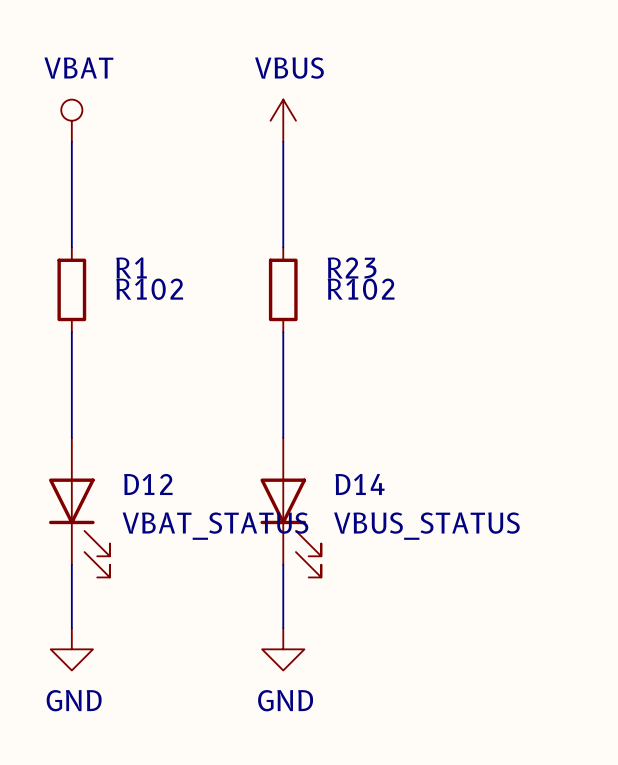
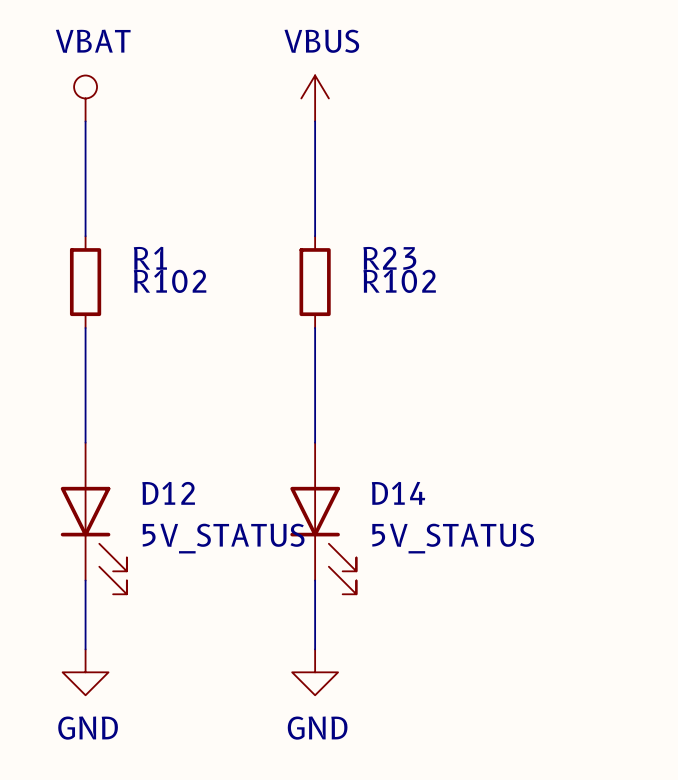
D12 value: VBAT_STATUS (215, 526) -> 5V_STATUS (223, 538)
D14 value: VBUS_STATUS (426, 526) -> 5V_STATUS (453, 538)

